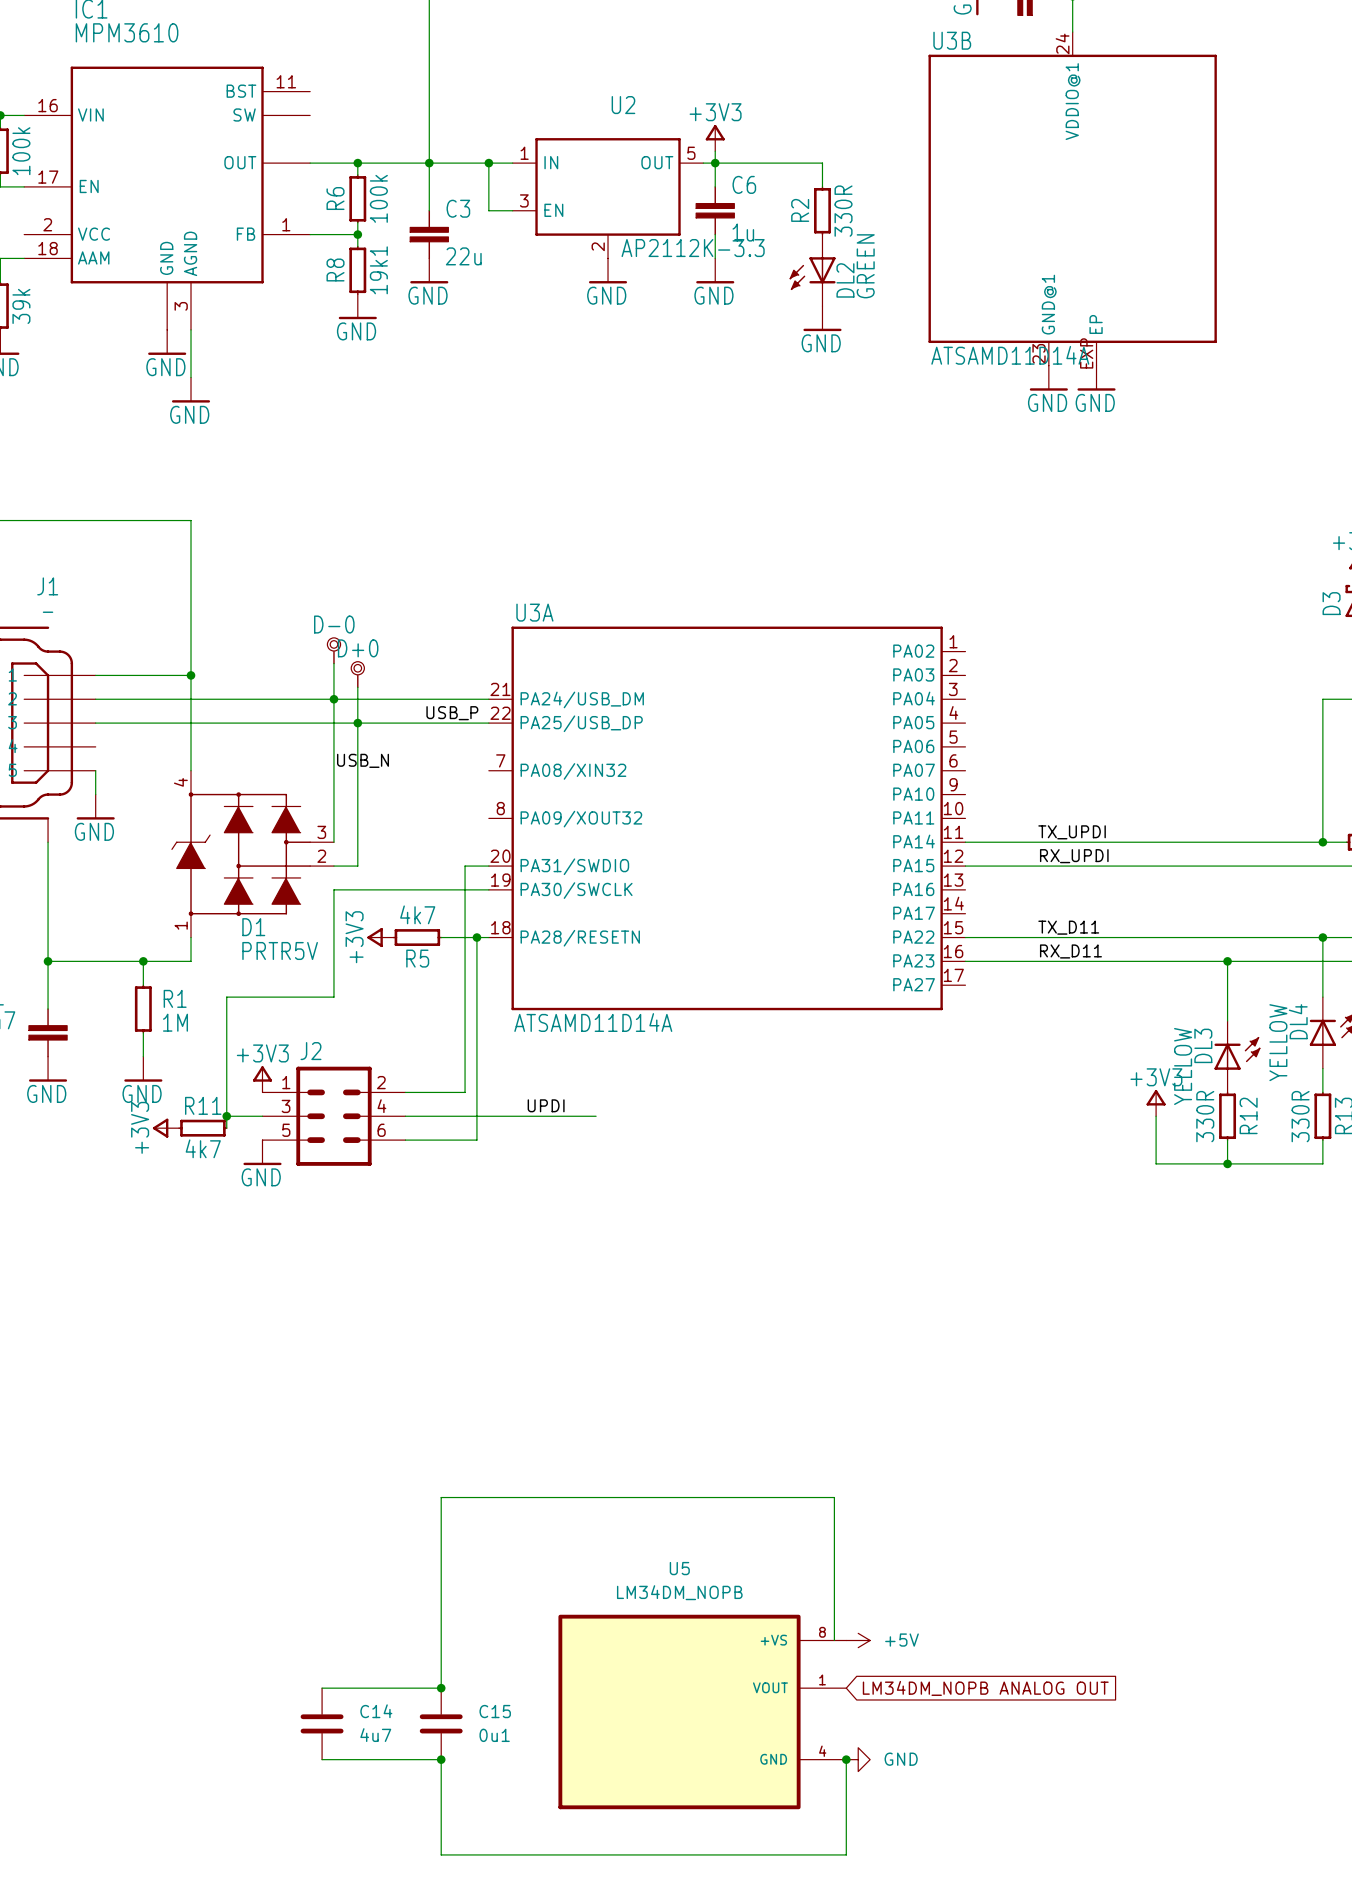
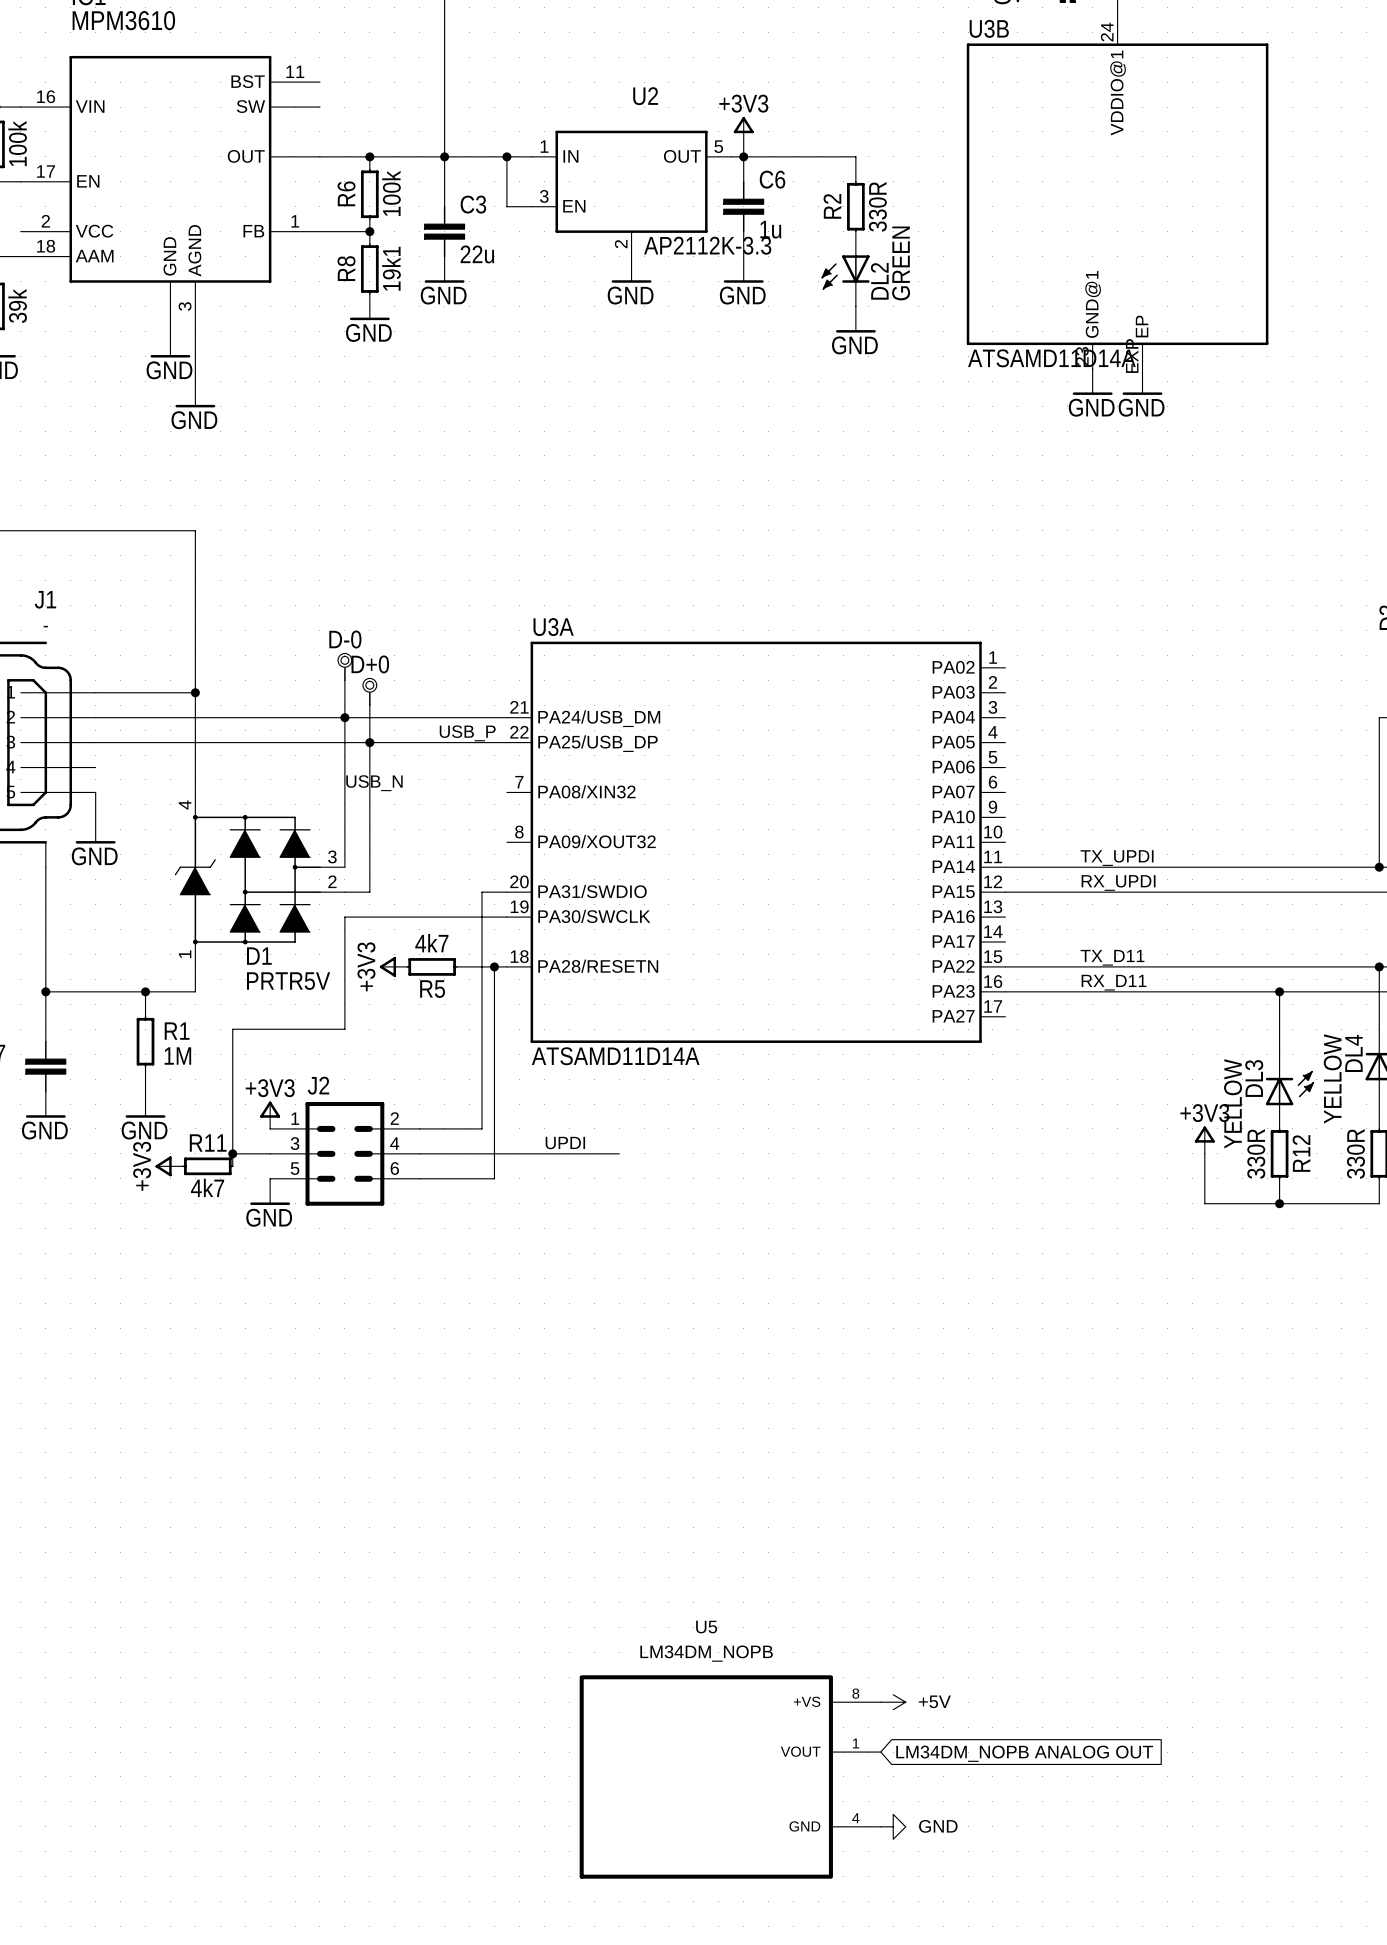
wire: (834, 1640) (834, 1497) (441, 1497) (441, 1688) (322, 1688) -> none
junction: (441, 1688) -> none
C14: 4u7 (322, 1723) -> none
C15: 0u1 (441, 1723) -> none
wire: (322, 1759) (441, 1759) (441, 1854) (846, 1854) (846, 1759) -> none
junction: (441, 1759) -> none
junction: (846, 1759) -> none

